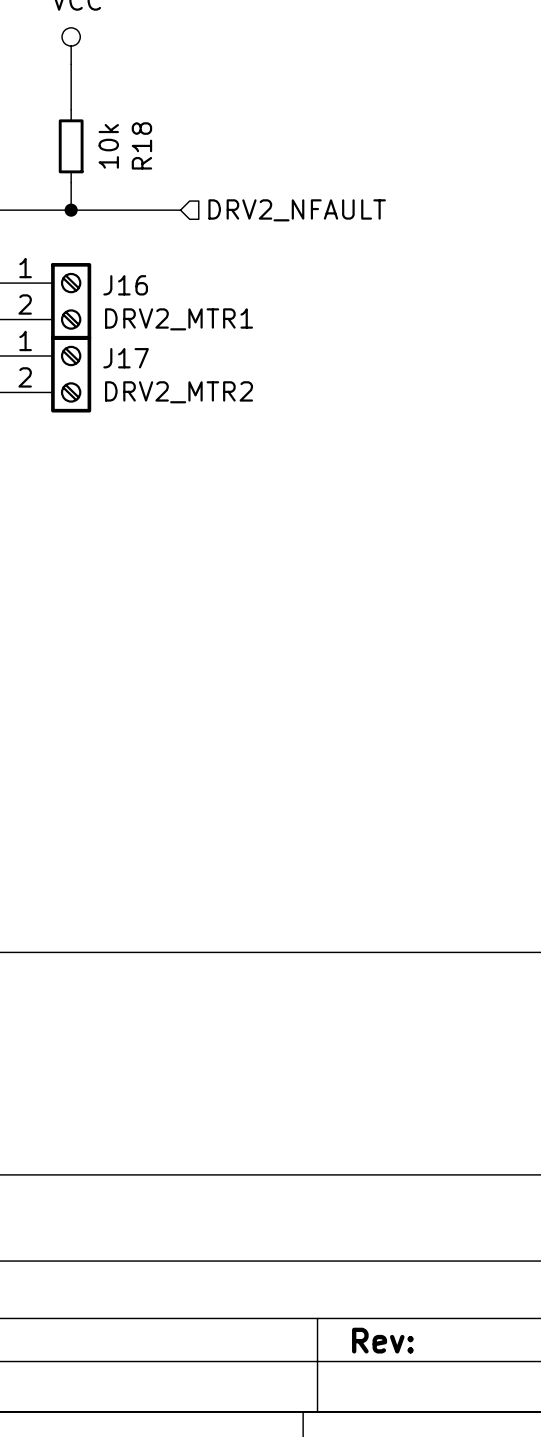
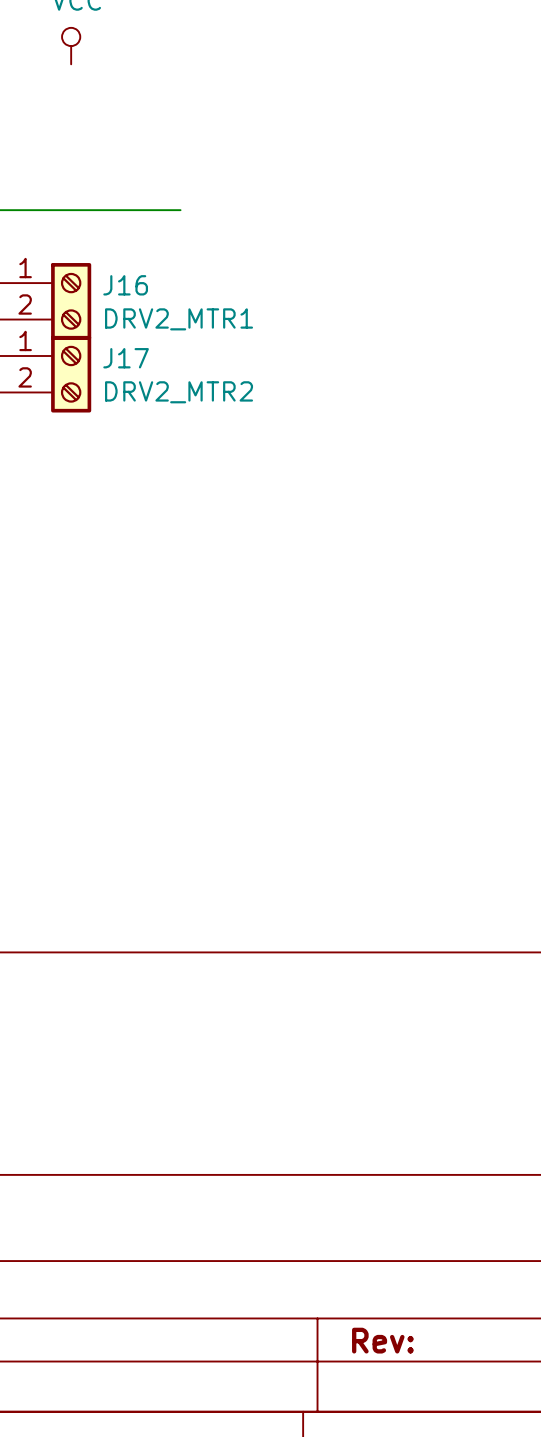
wire: (71, 64) (71, 109) -> none
R18: 10k (71, 146) -> none
wire: (71, 182) (71, 210) -> none
junction: (71, 210) -> none
hierarchical label: DRV2_NFAULT (297, 210) -> none

